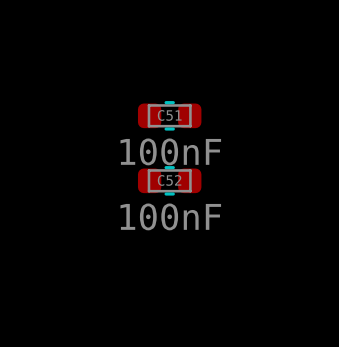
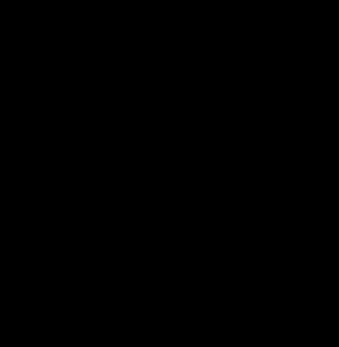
C51: 100nF (169, 115) -> none
C52: 100nF (169, 180) -> none

